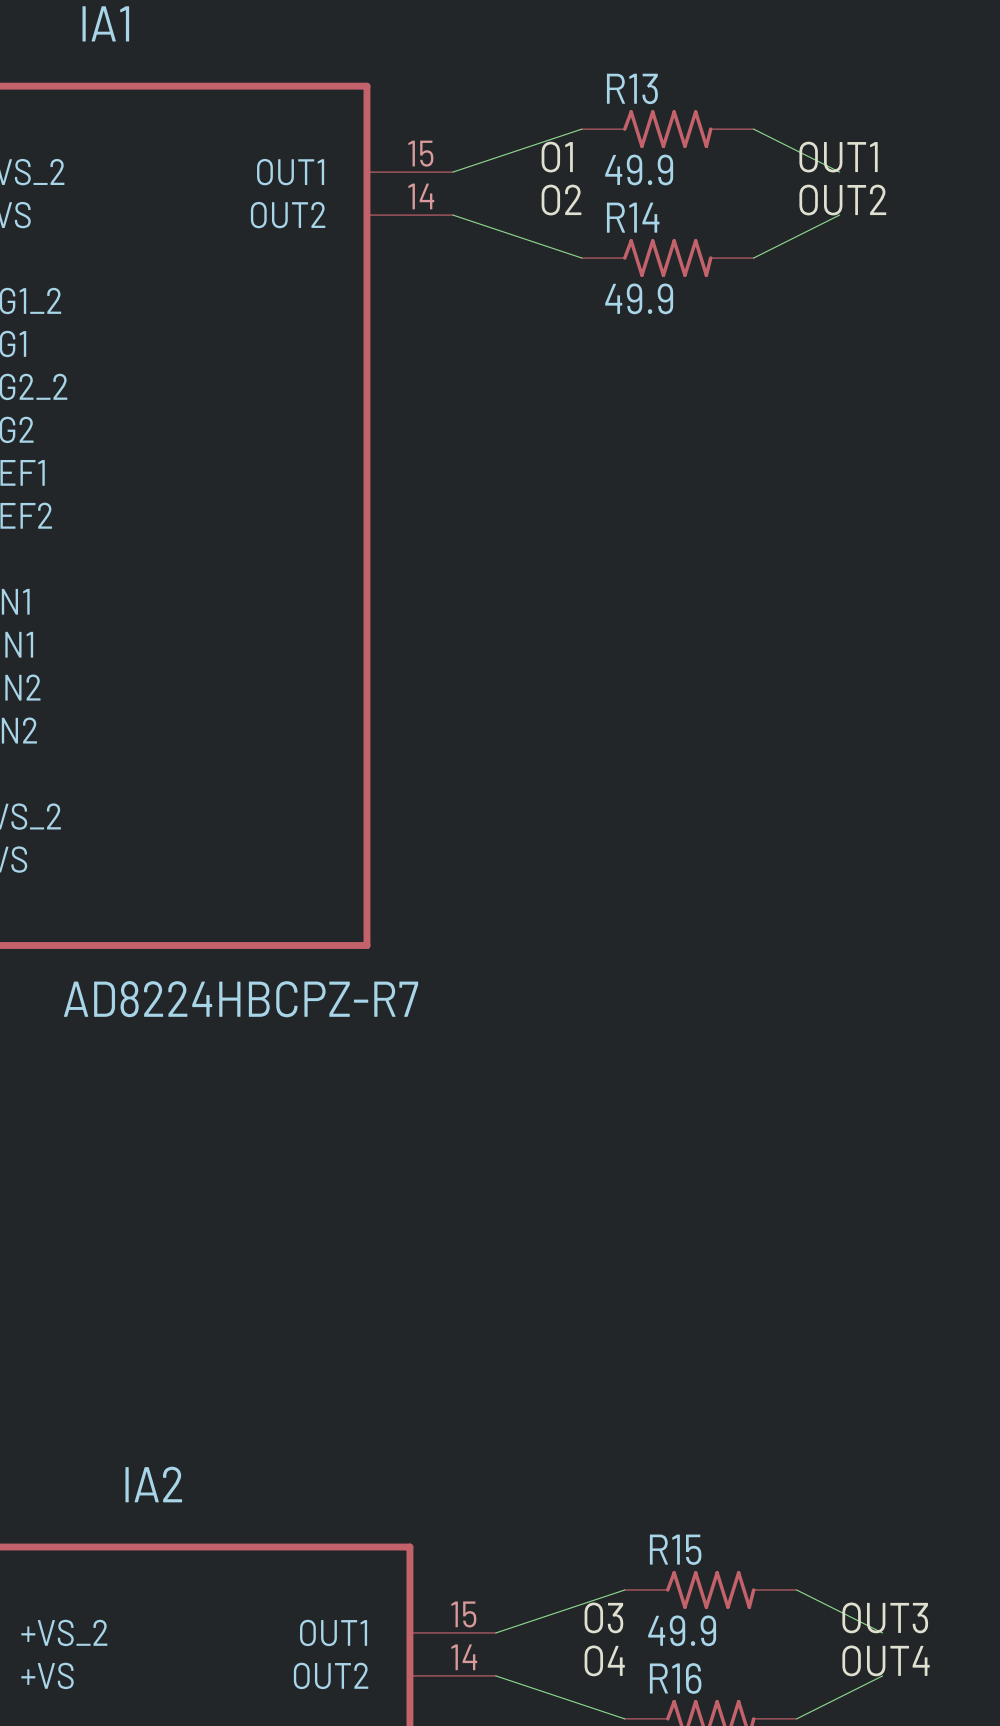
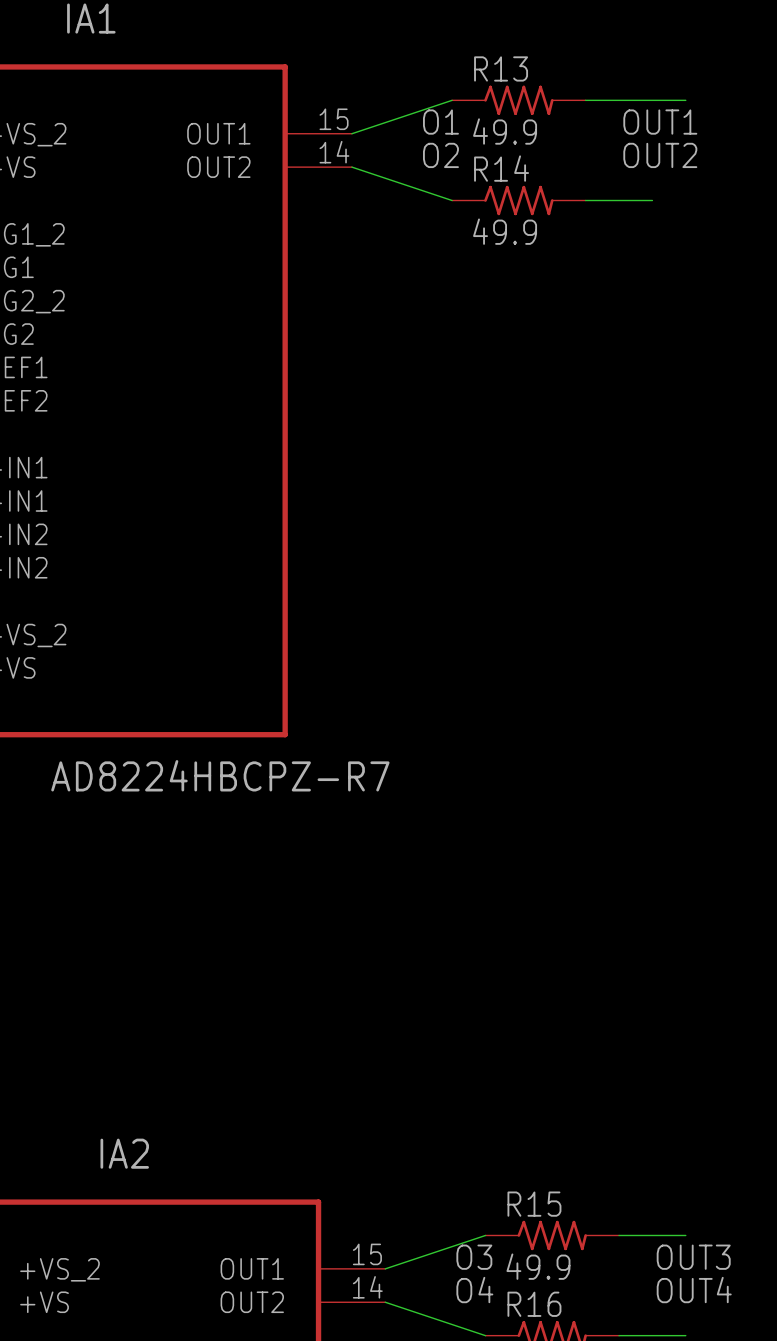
wire: (753, 129) (839, 172) -> (585, 100) (685, 100)
wire: (839, 215) (753, 258) -> (652, 200) (585, 200)
wire: (796, 1589) (882, 1632) -> (619, 1235) (685, 1235)
wire: (882, 1675) (796, 1718) -> (685, 1335) (619, 1335)

